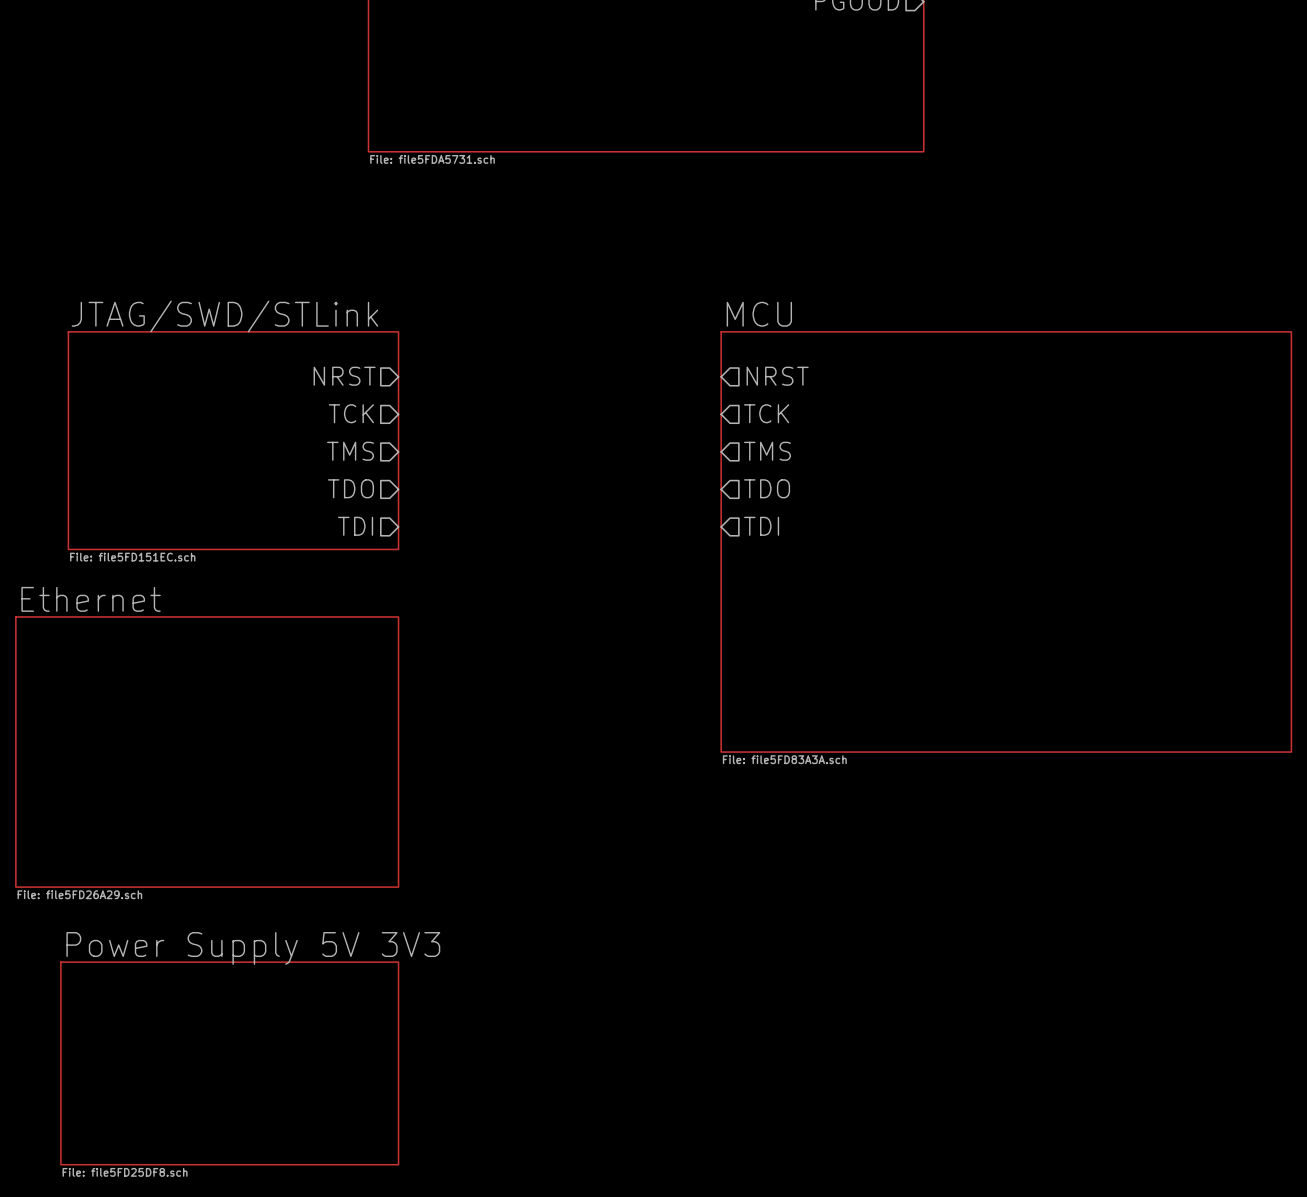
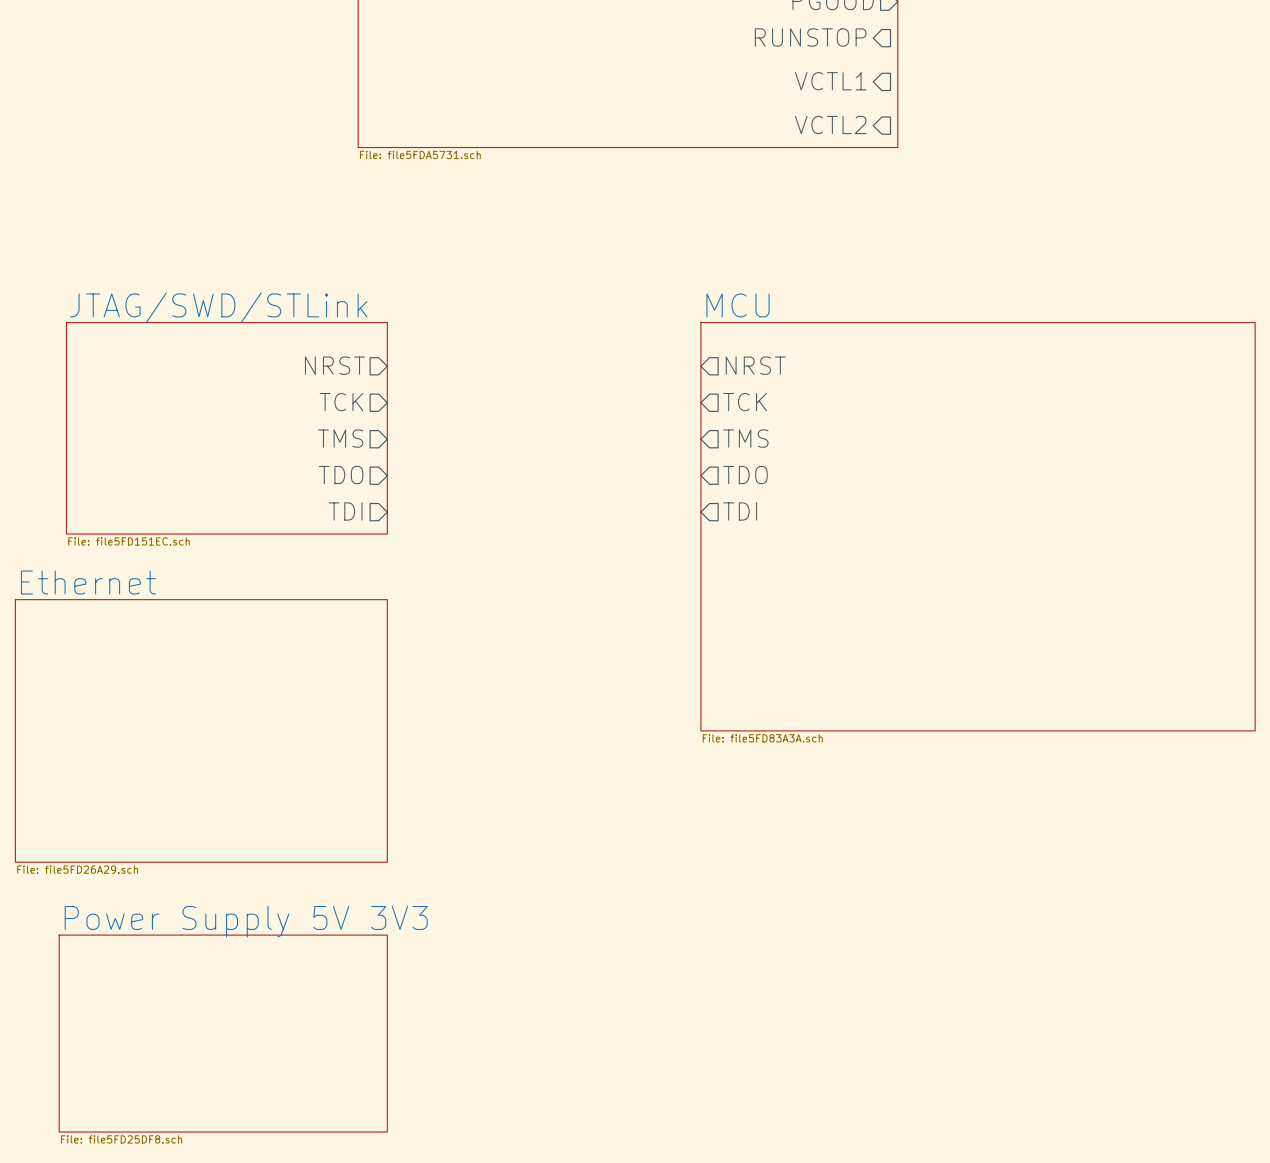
sheet pin: none -> RUNSTOP (810, 37)
sheet pin: none -> VCTL1 (830, 81)
sheet pin: none -> VCTL2 (830, 125)

